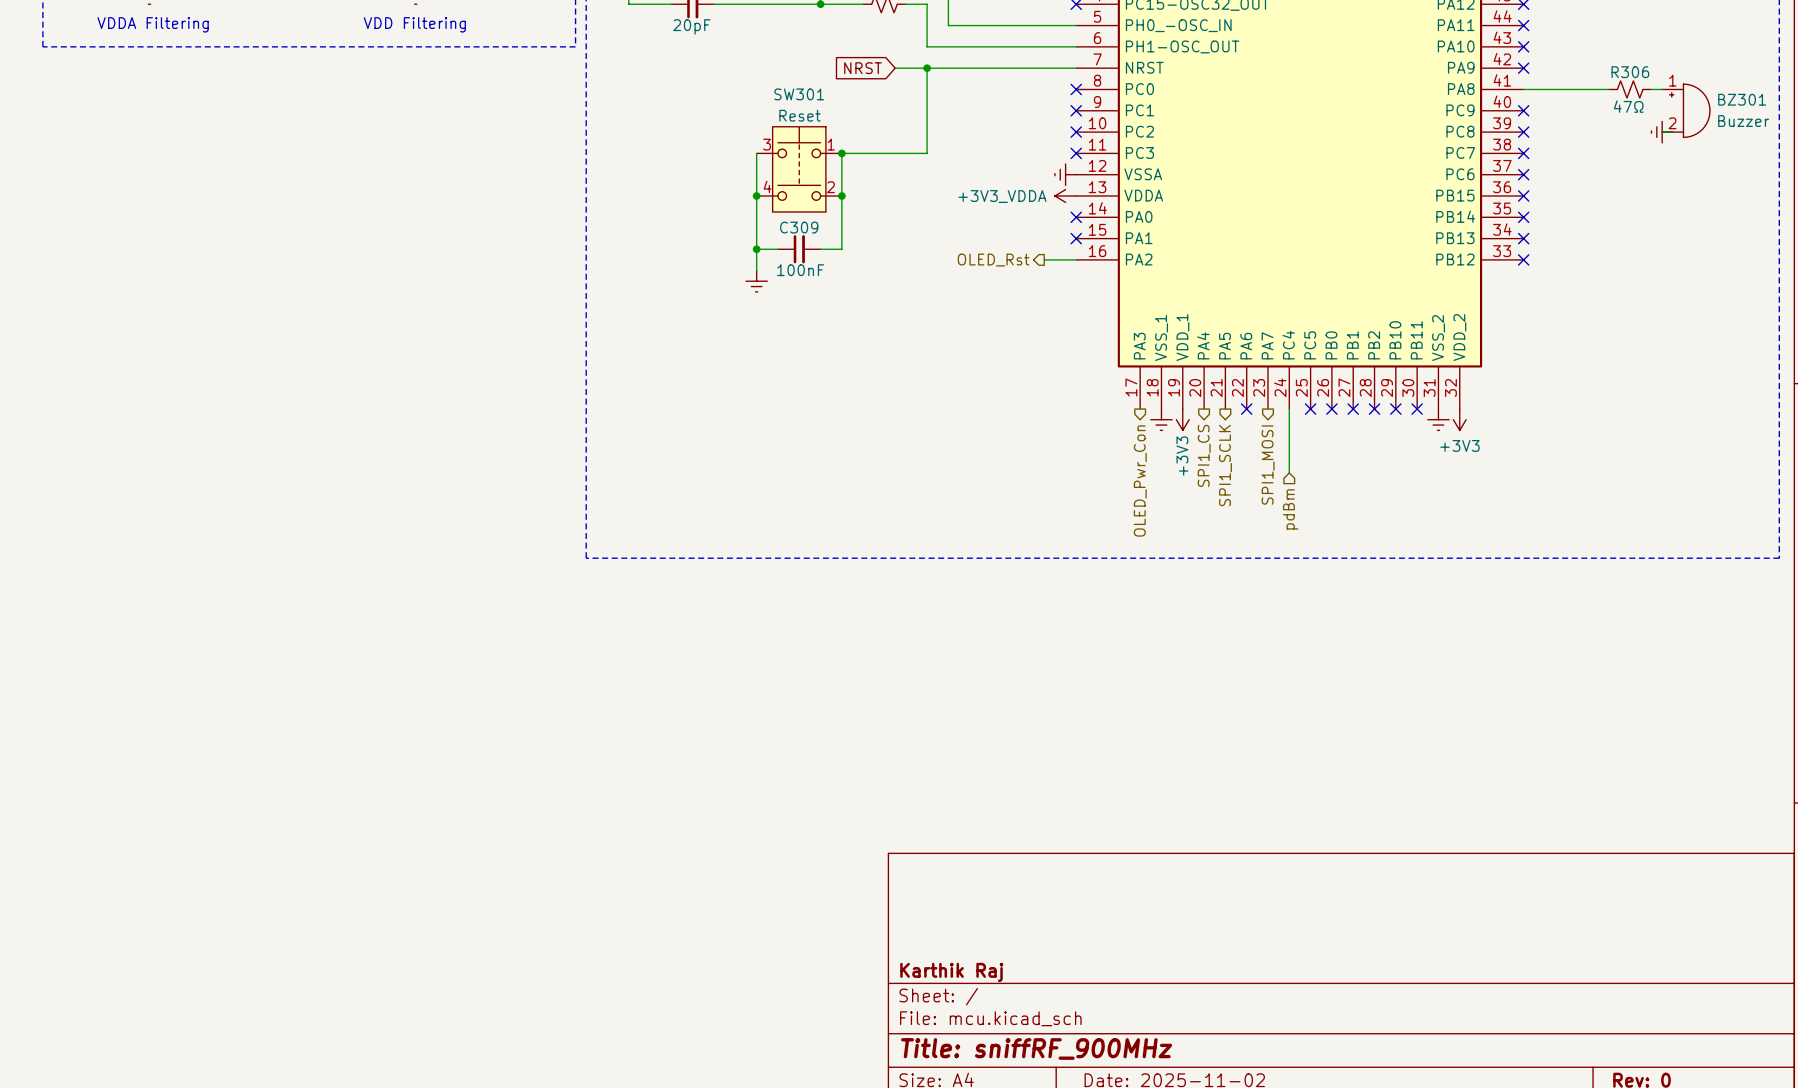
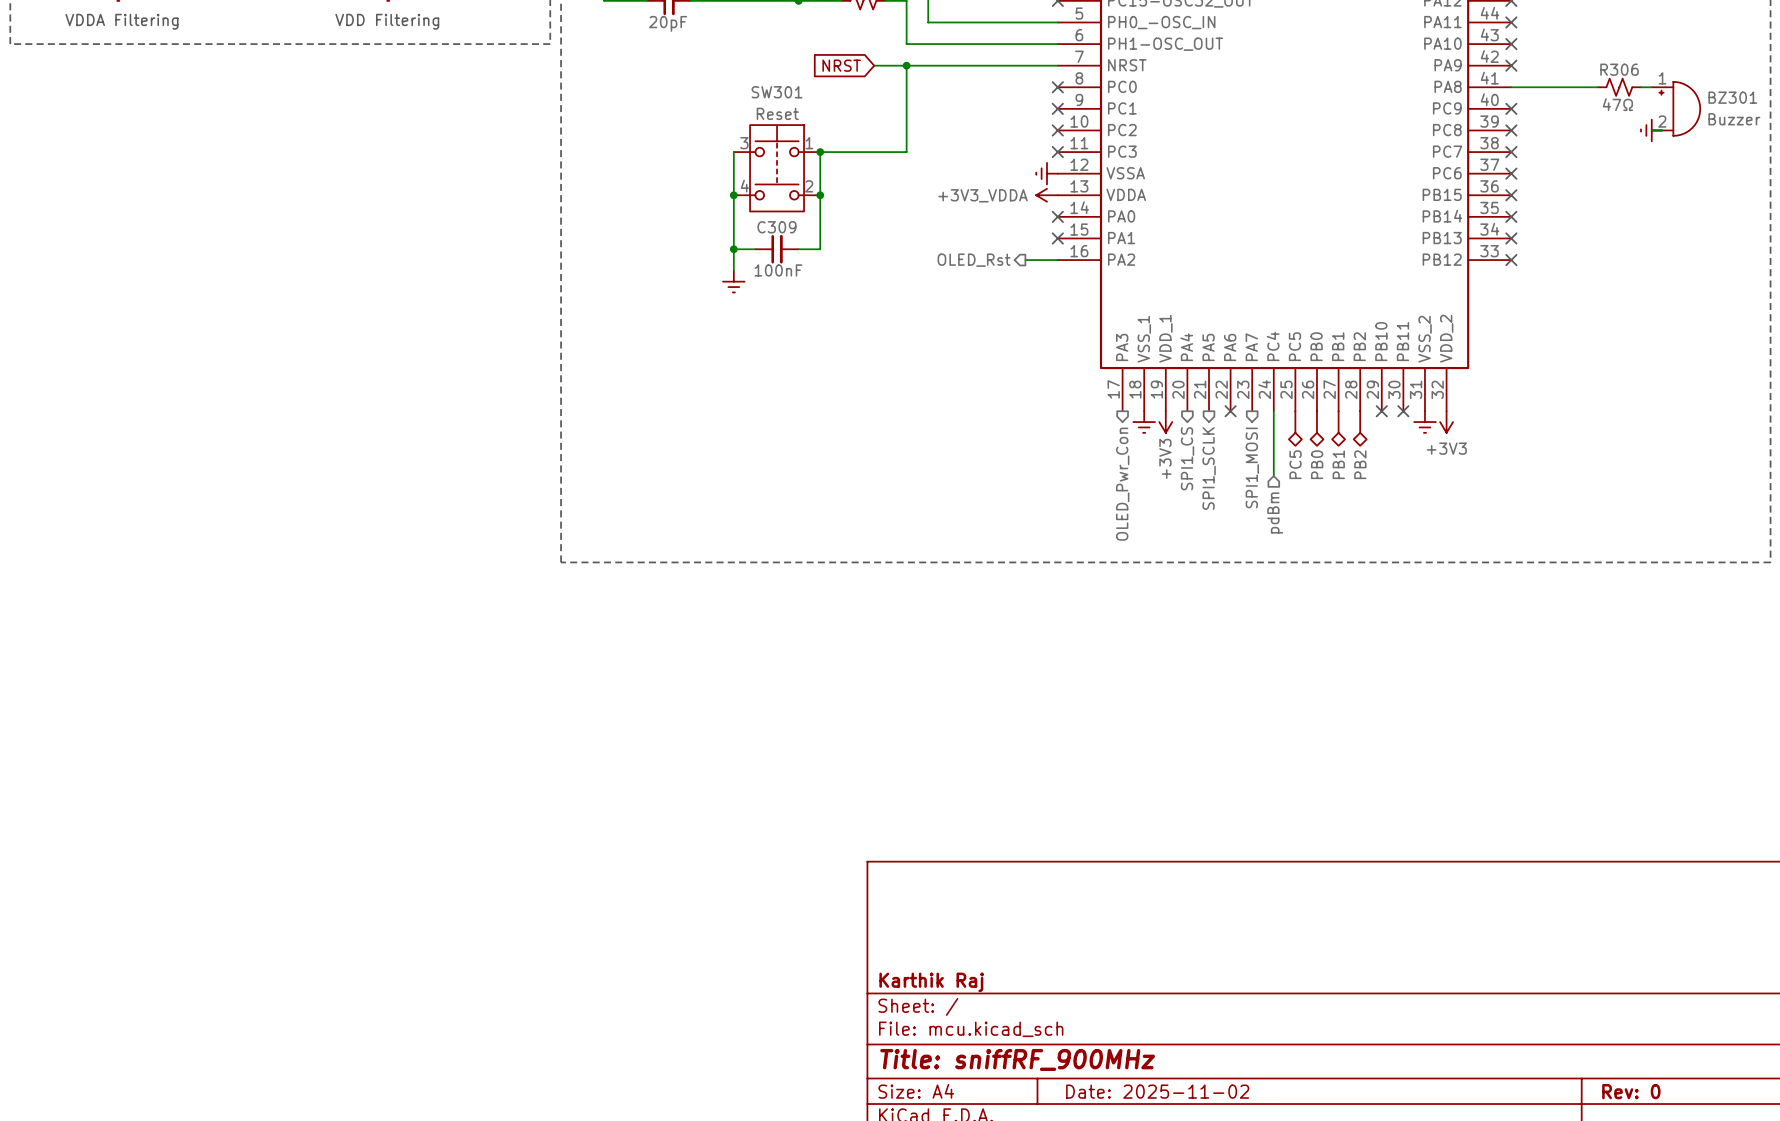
no-connect mark: (1310, 409) -> none
no-connect mark: (1331, 409) -> none
no-connect mark: (1353, 409) -> none
no-connect mark: (1374, 409) -> none
PC5: none -> (1295, 428)
PB0: none -> (1316, 428)
PB1: none -> (1338, 428)
PB2: none -> (1360, 428)

